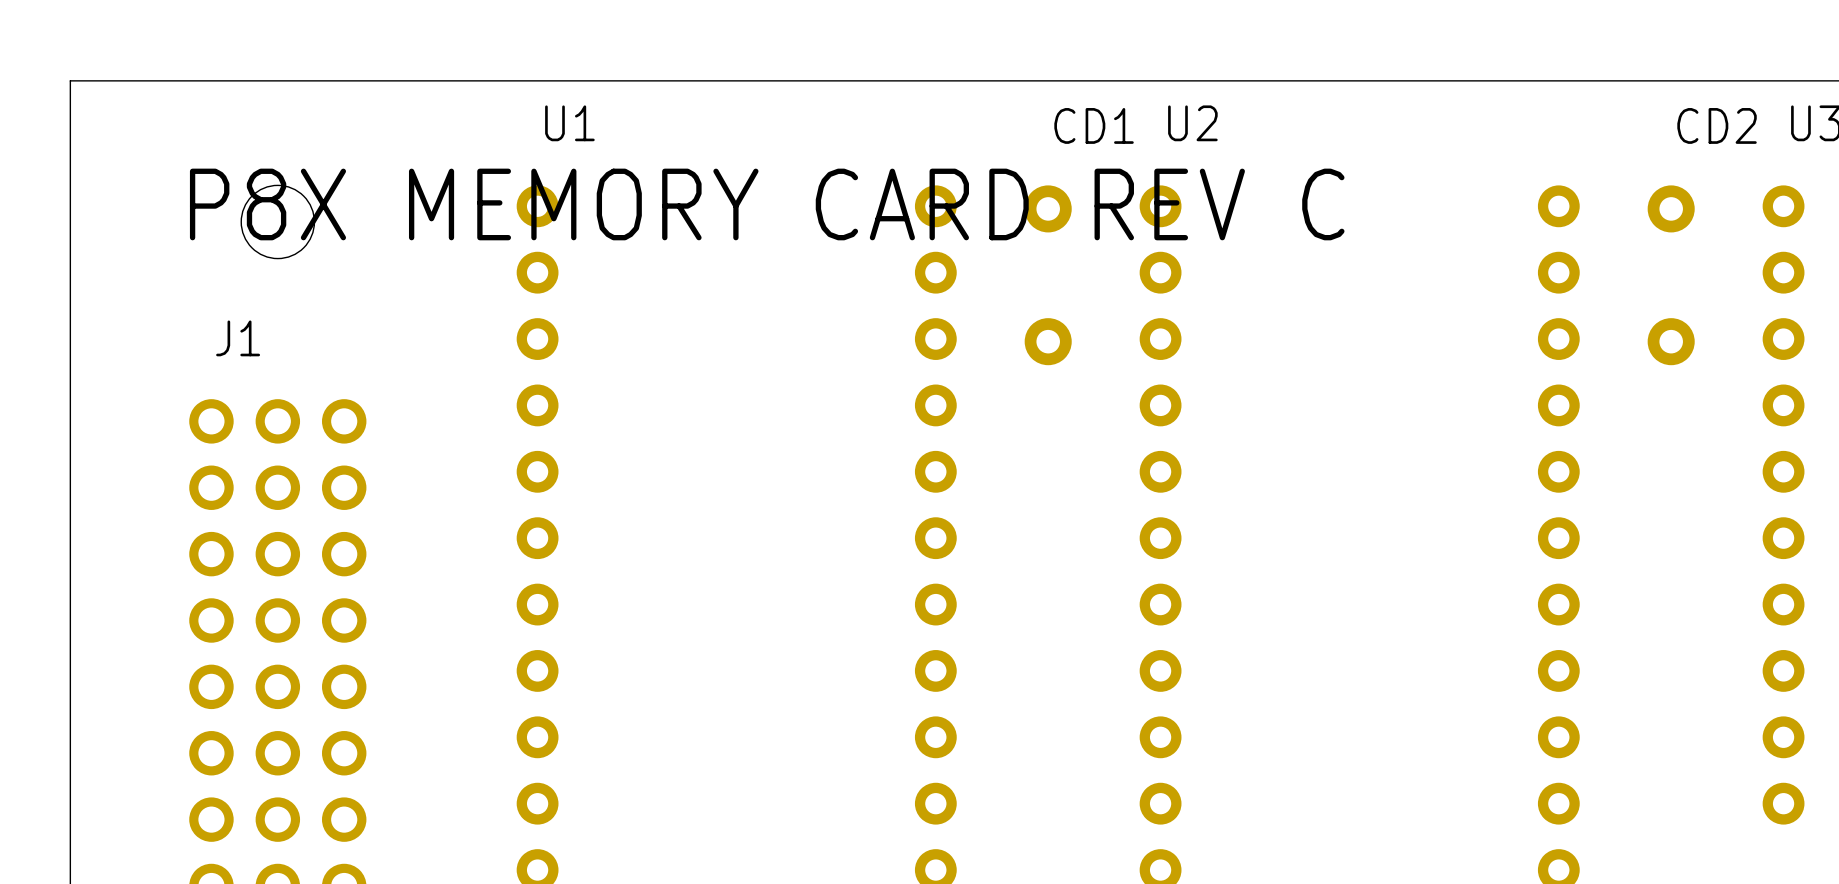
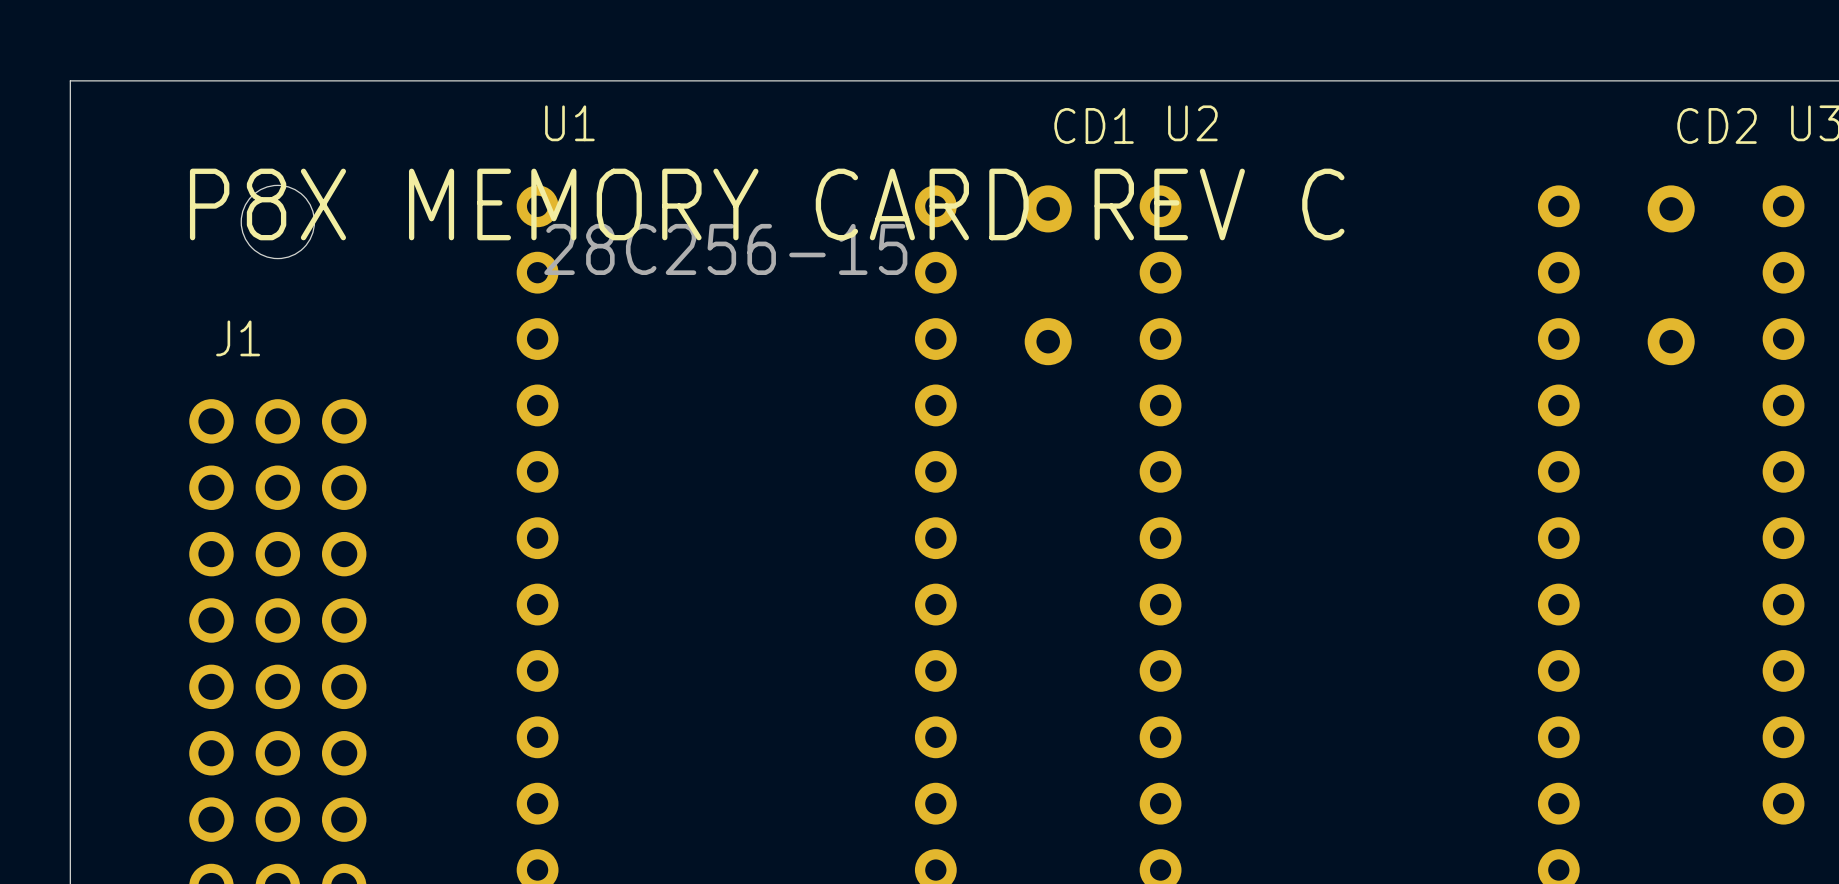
U1 value: none -> 28C256-15 (725, 249)

